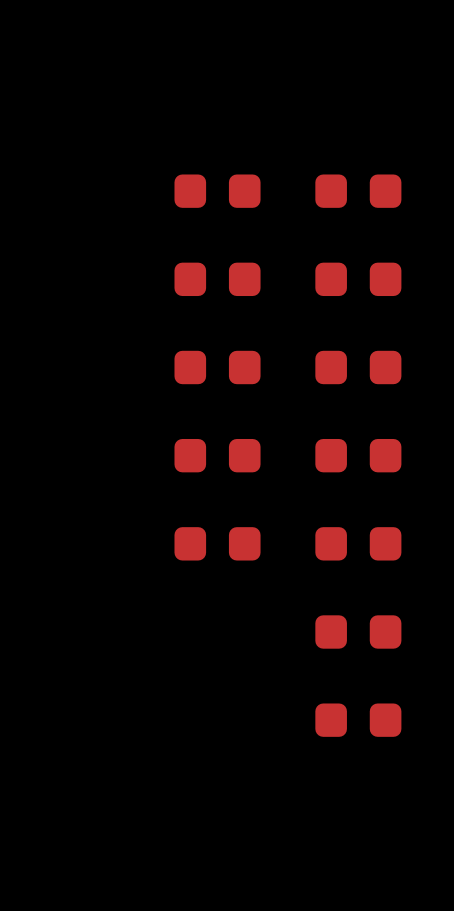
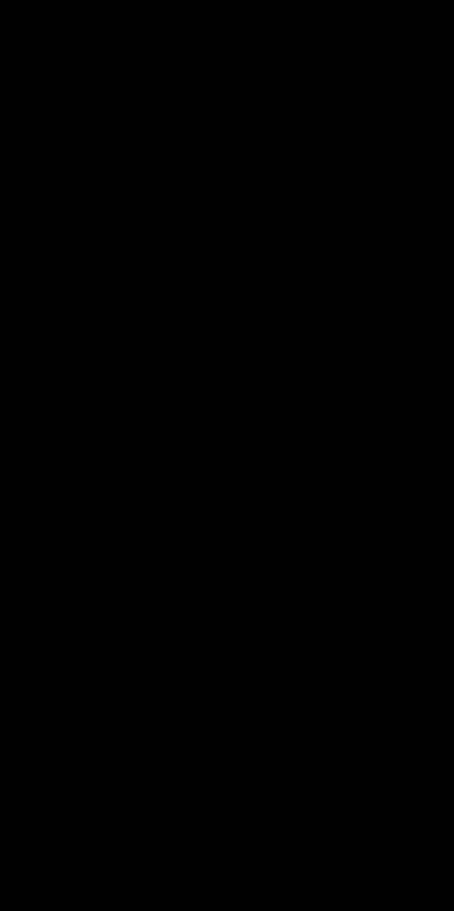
part: (217, 191) -> none
part: (358, 191) -> none
part: (217, 279) -> none
part: (358, 279) -> none
part: (217, 367) -> none
part: (358, 367) -> none
part: (217, 455) -> none
part: (358, 455) -> none
part: (217, 543) -> none
part: (358, 543) -> none
part: (358, 632) -> none
part: (358, 720) -> none

